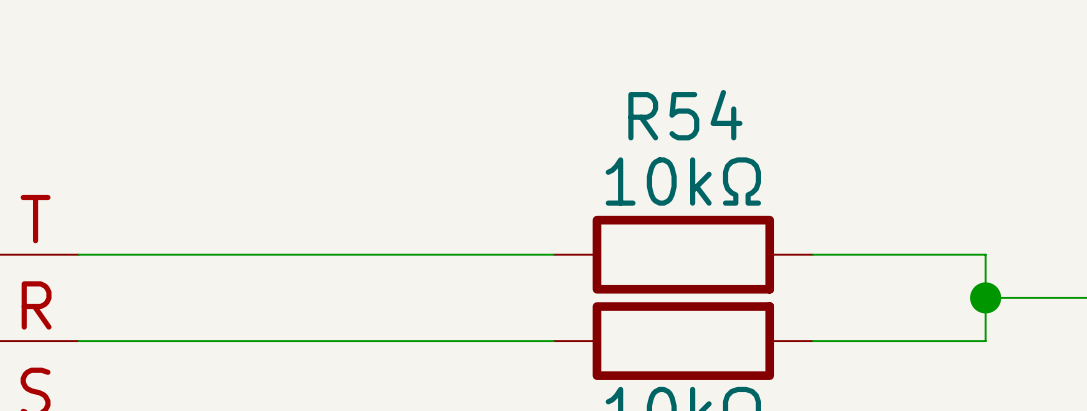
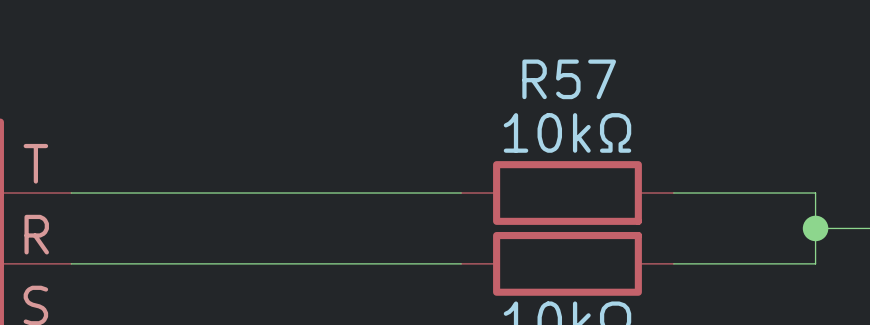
R54 name: R54 (685, 115) -> R57 (569, 79)

